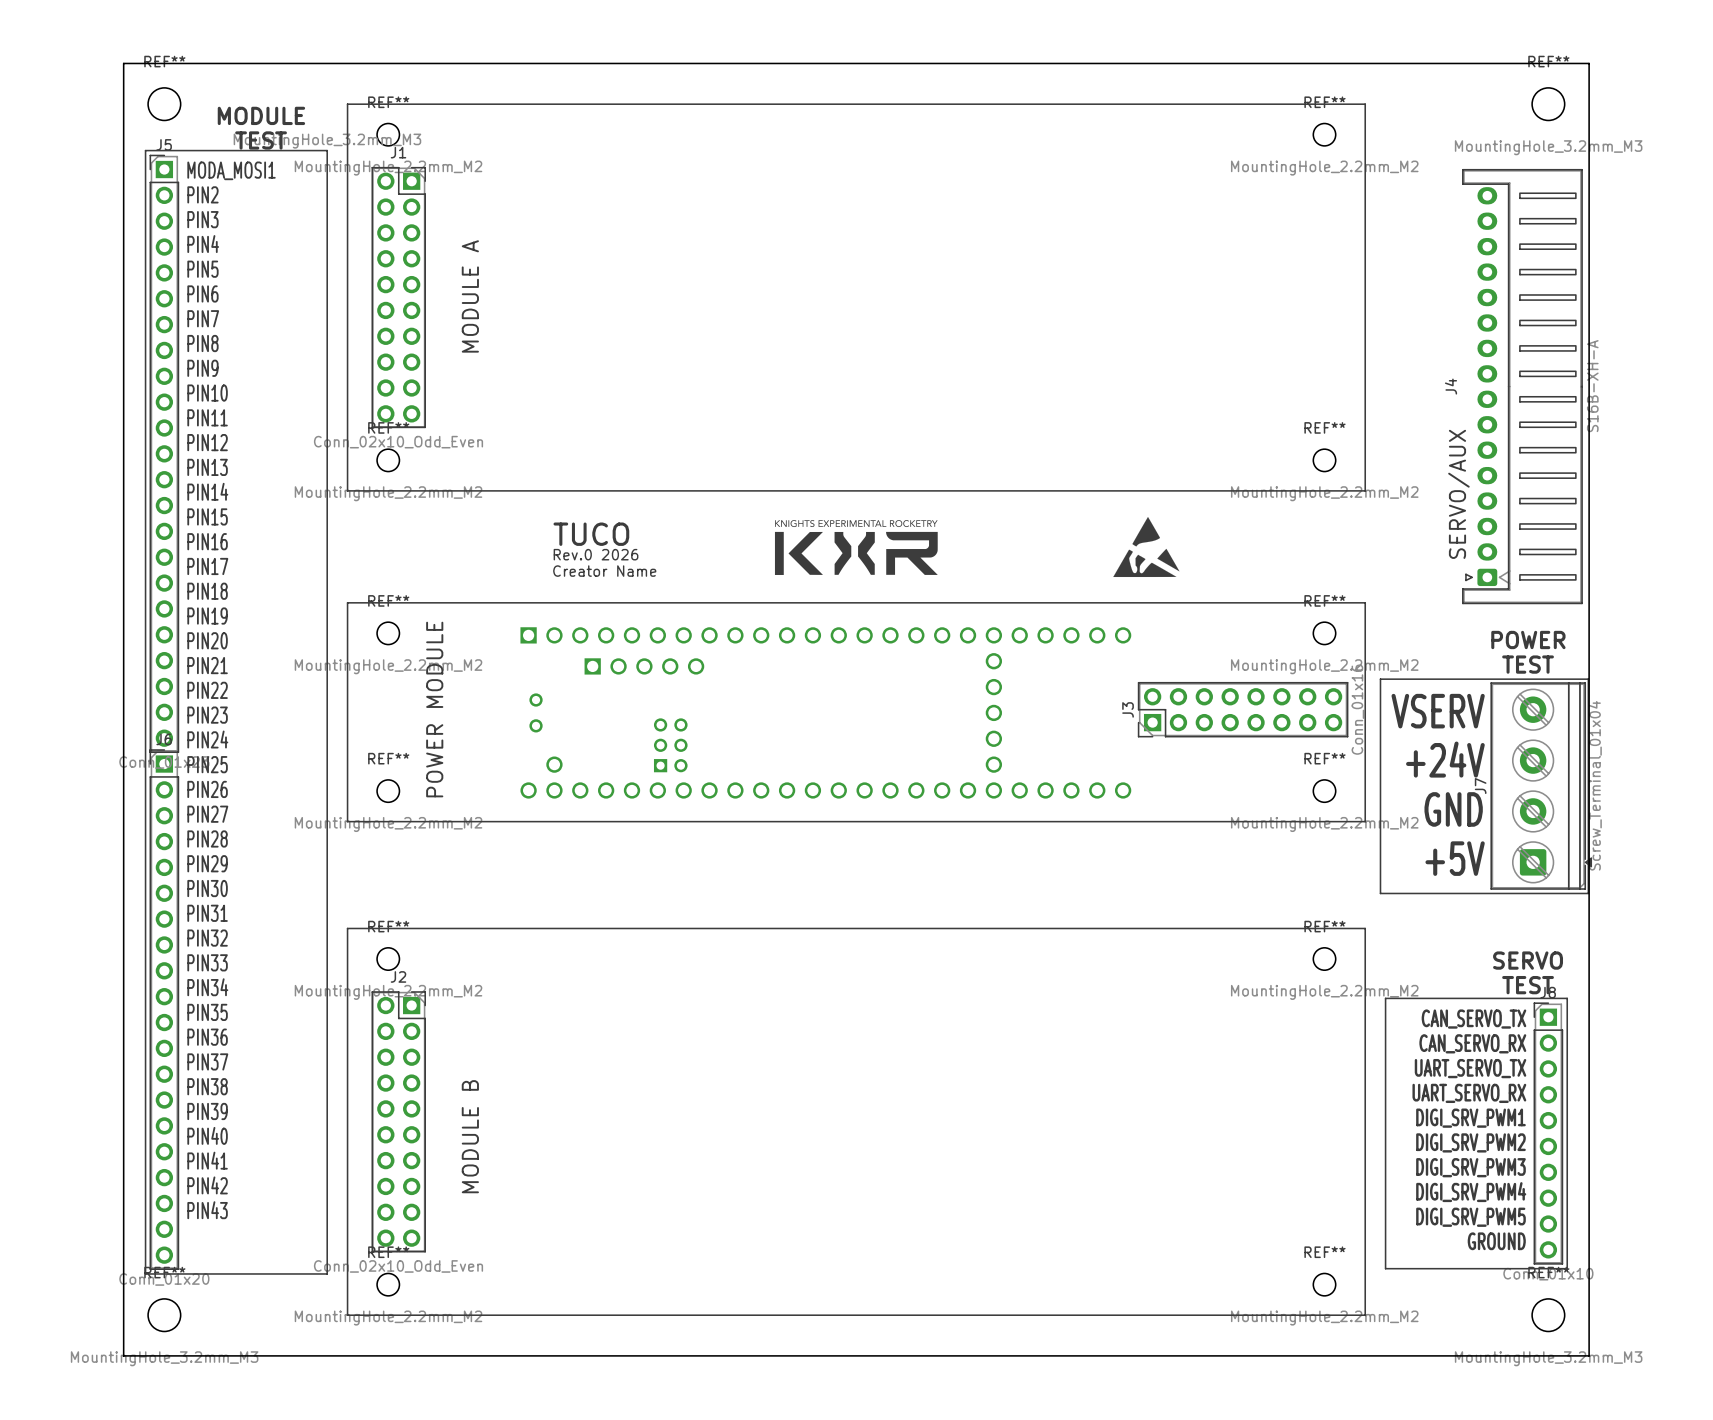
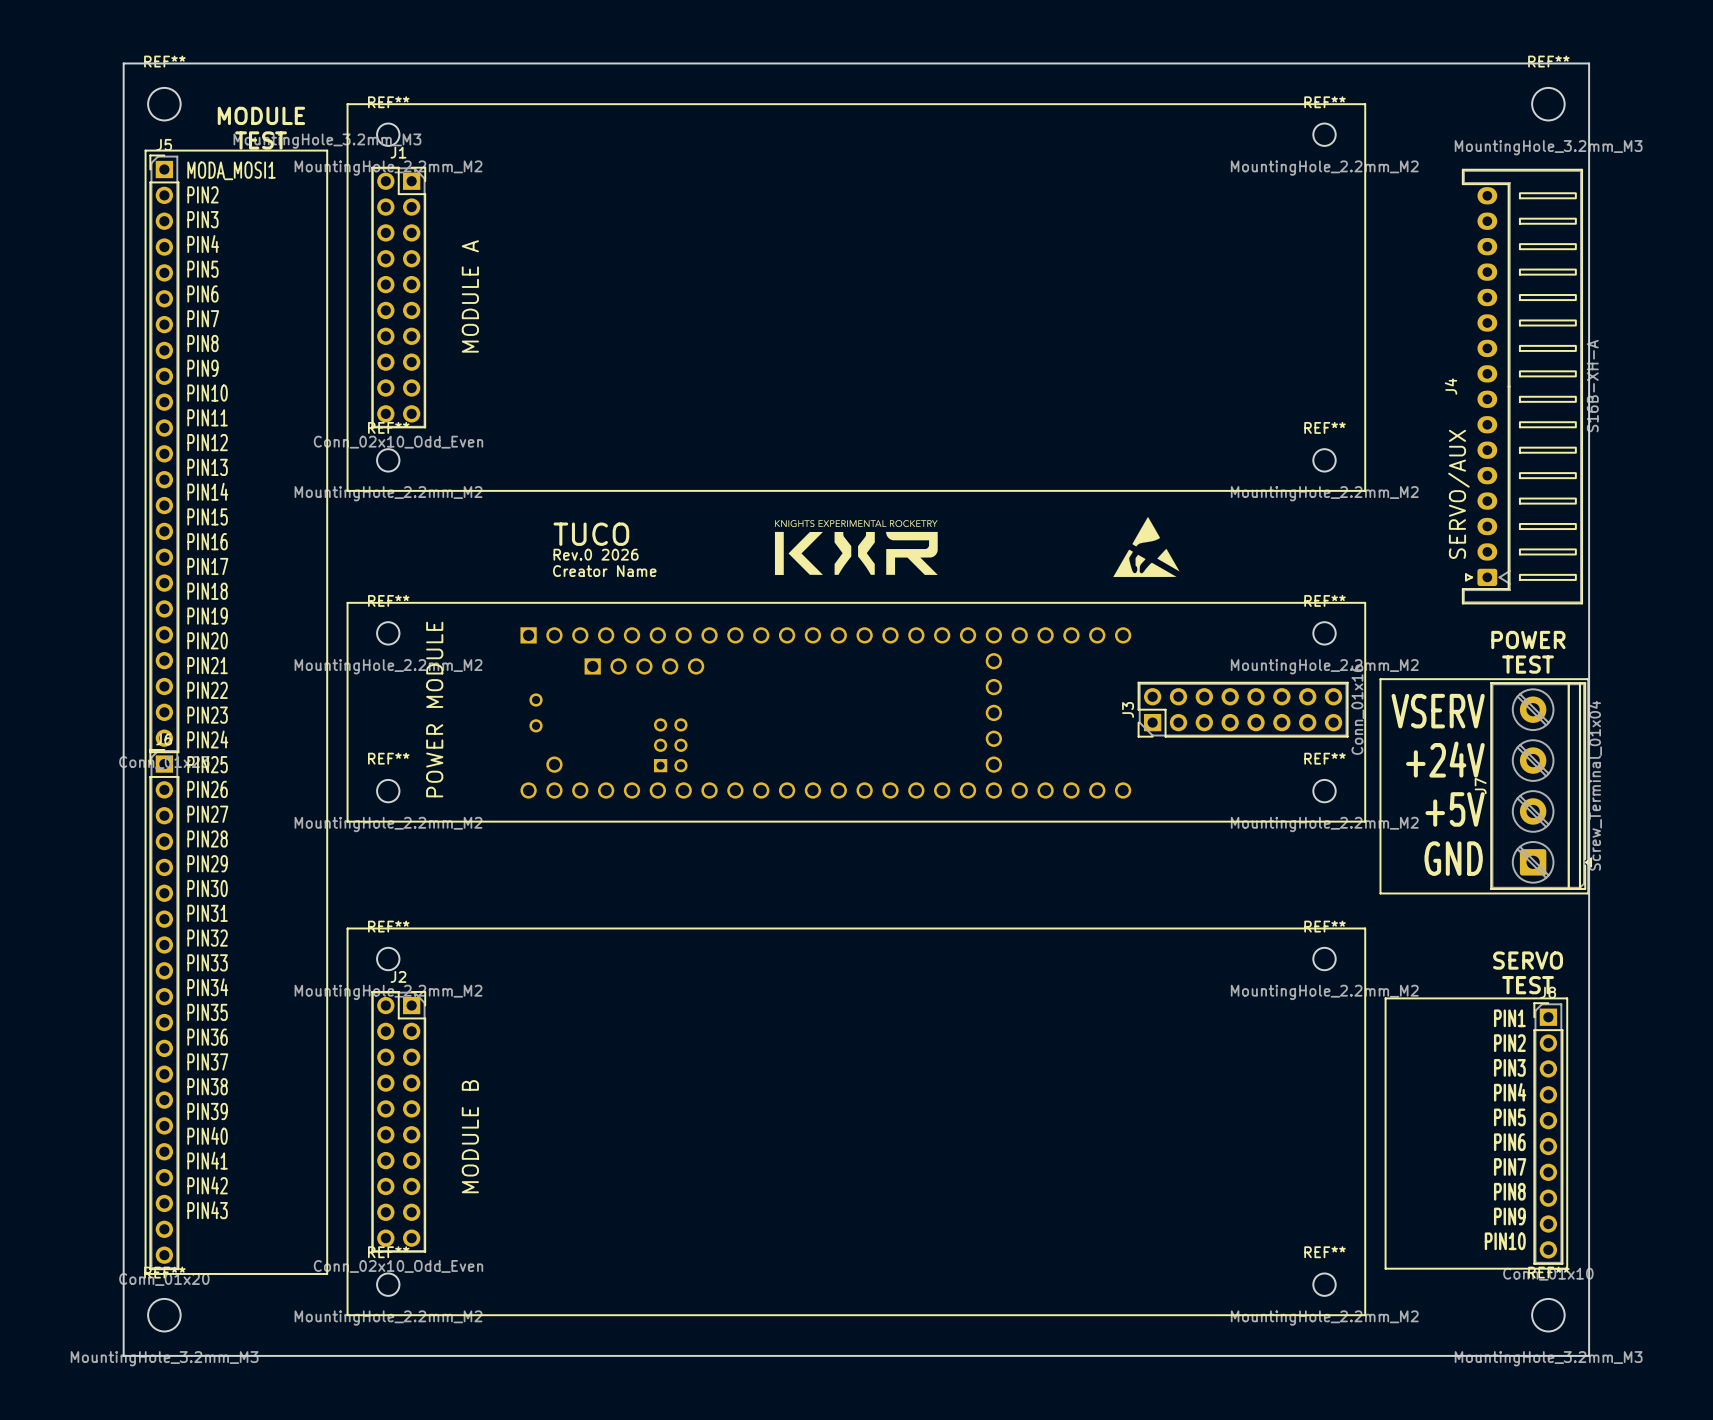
text: GND (1453, 809) -> +5V (1455, 809)
text: +5V (1455, 858) -> GND (1453, 858)
text: CAN_SERVO_TX (1473, 1019) -> PIN1 (1509, 1018)
text: CAN_SERVO_RX (1472, 1043) -> PIN2 (1509, 1043)
text: UART_SERVO_TX (1470, 1068) -> PIN3 (1509, 1067)
text: UART_SERVO_RX (1469, 1093) -> PIN4 (1510, 1092)
text: DIGI_SRV_PWM1 (1470, 1118) -> PIN5 (1509, 1117)
text: DIGI_SRV_PWM2 (1470, 1142) -> PIN6 (1509, 1142)
text: DIGI_SRV_PWM3 (1470, 1167) -> PIN7 (1510, 1166)
text: DIGI_SRV_PWM4 (1471, 1192) -> PIN8 (1509, 1191)
text: DIGI_SRV_PWM5 (1470, 1217) -> PIN9 (1509, 1216)
text: GROUND (1496, 1241) -> PIN10 (1505, 1241)

